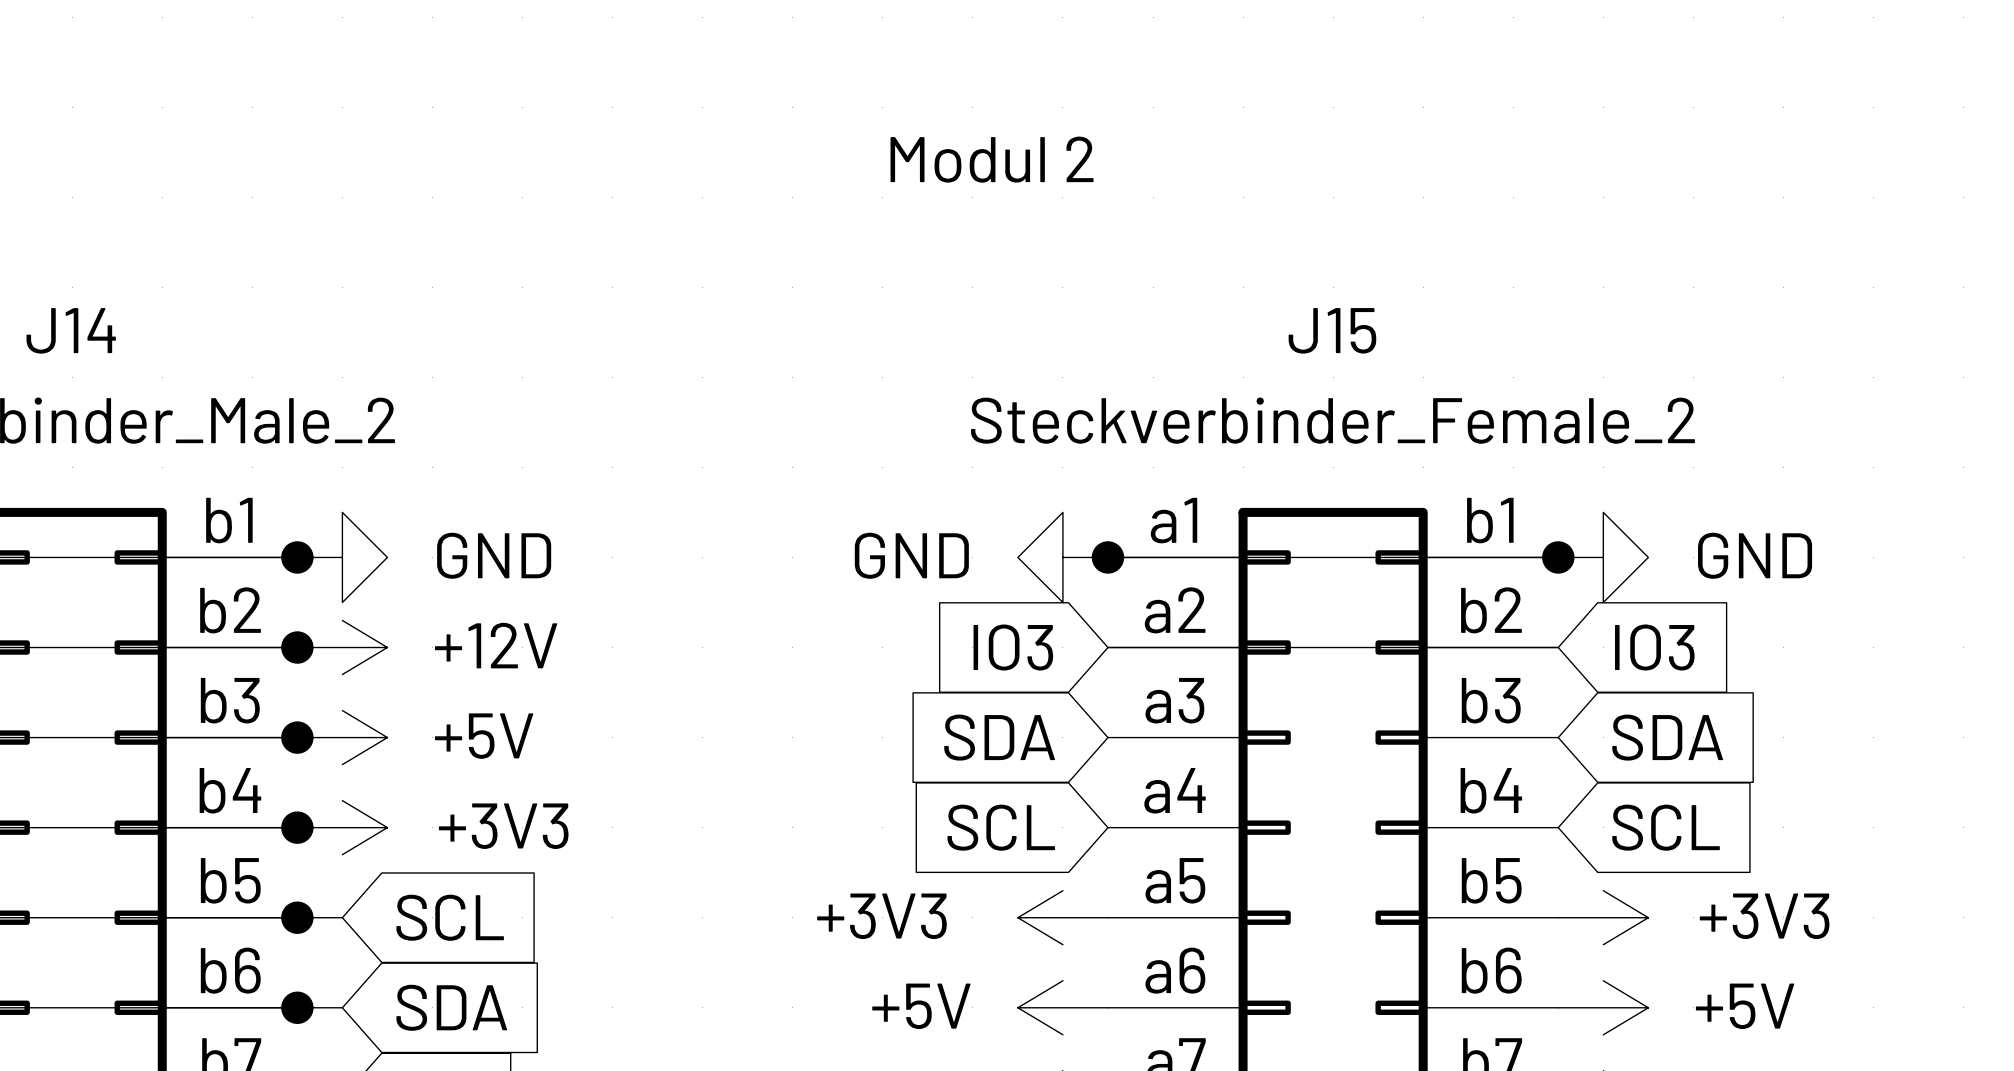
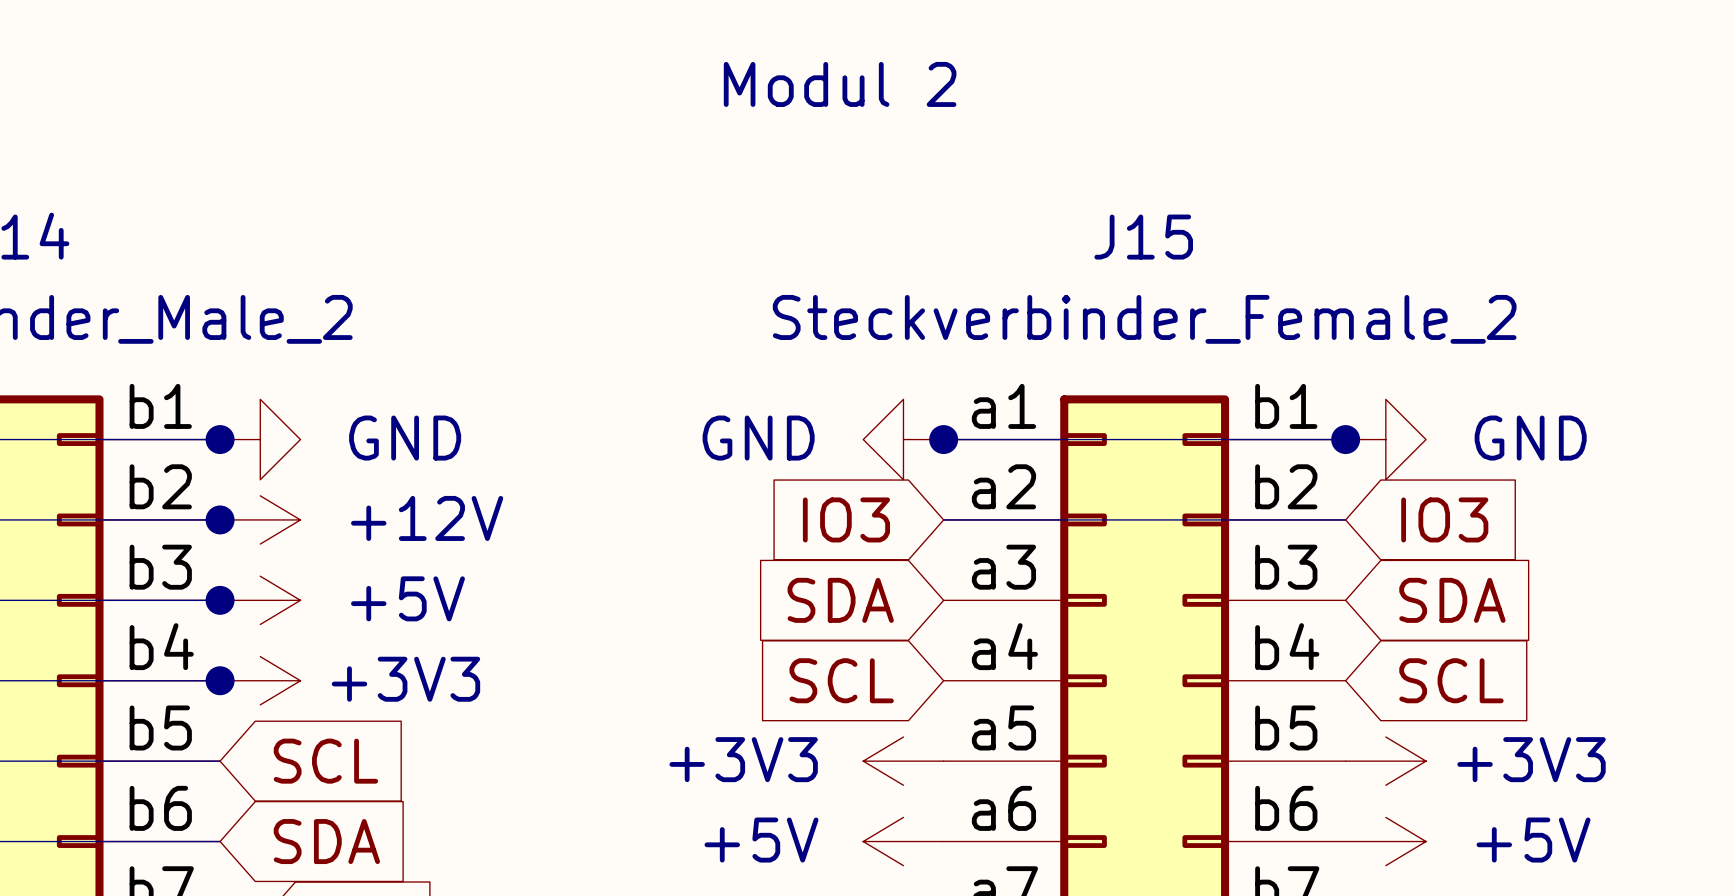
wire: (297, 917) (342, 917) -> none
junction: (297, 917) -> none
global label position: SCL (450, 917) -> SCL (325, 761)
wire: (297, 1007) (342, 1007) -> none
junction: (297, 1007) -> none
global label position: SDA (451, 1007) -> SDA (326, 841)

